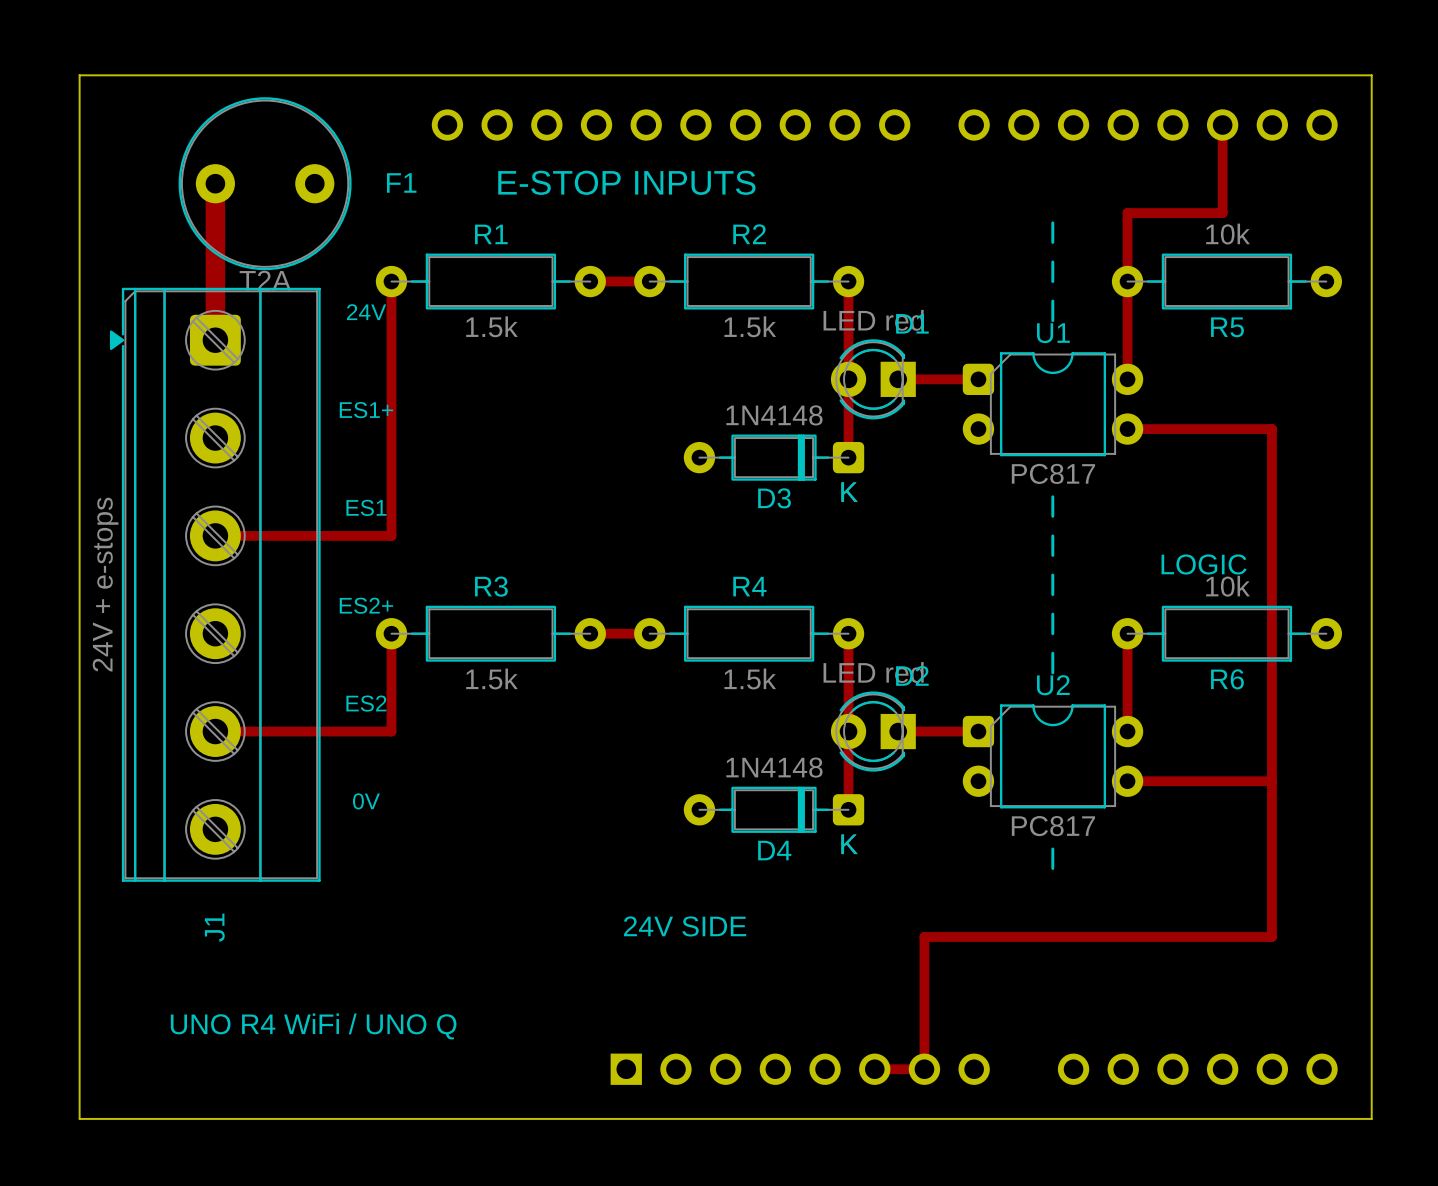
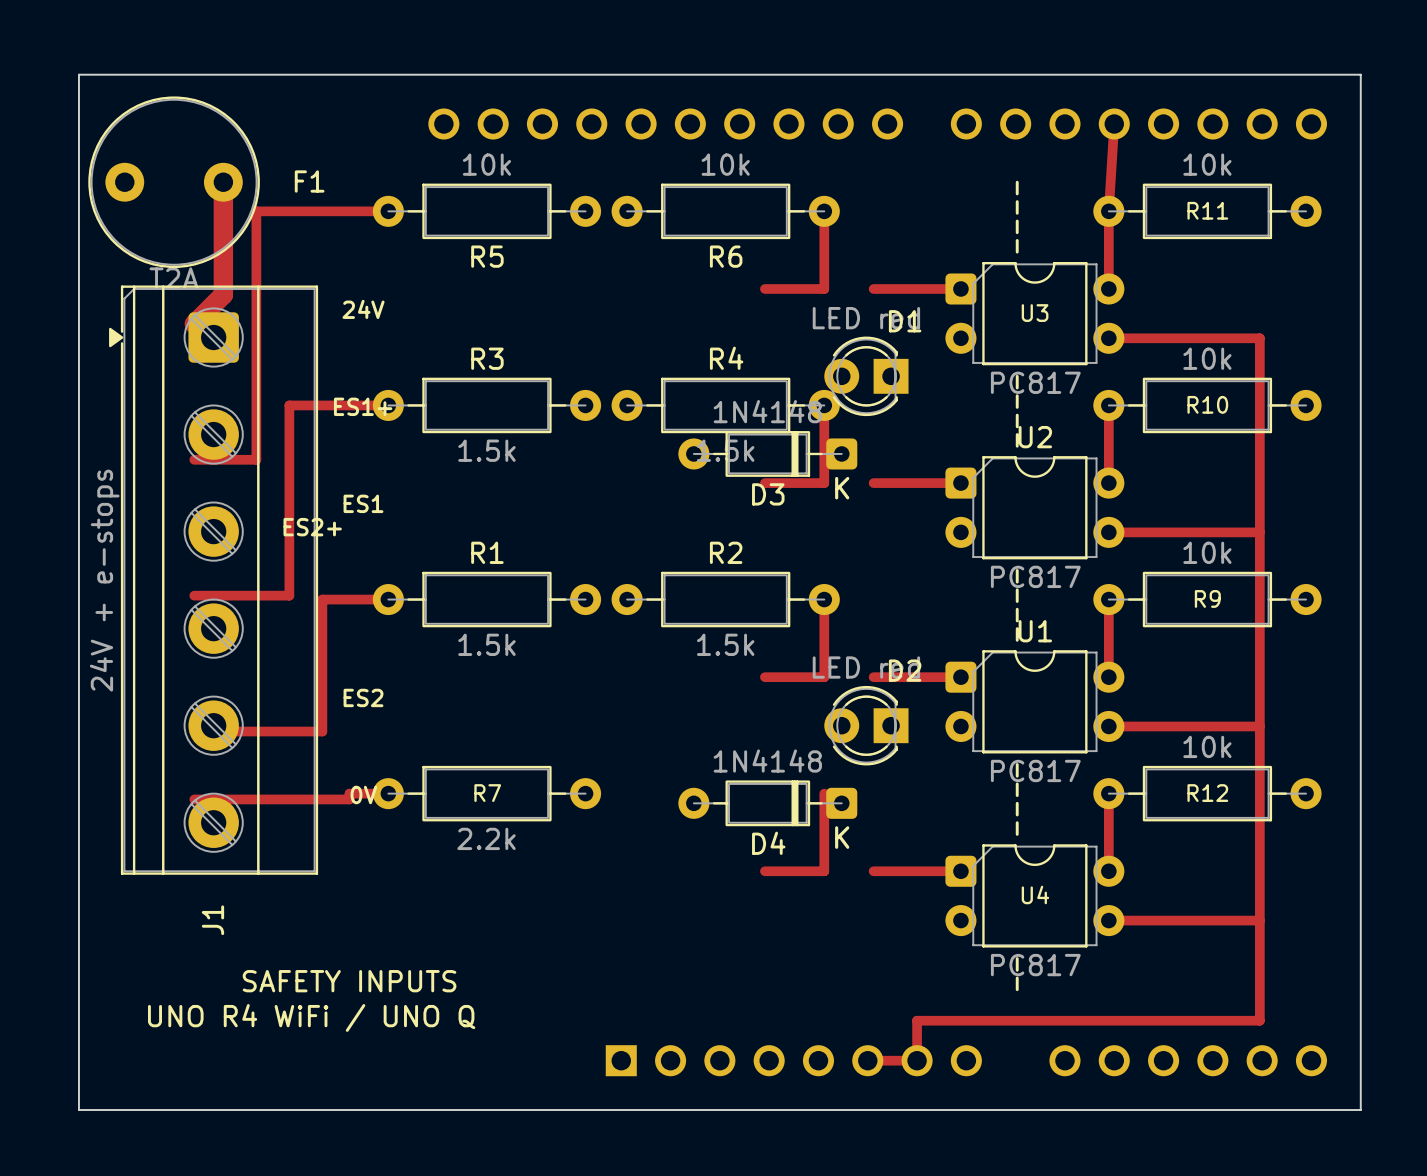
track: none -> (1114, 124) (1108, 211) (1108, 288)
track: (1222, 125) (1222, 213) (1127, 213) (1127, 379) -> none
text: E-STOP INPUTS (626, 182) -> none
track: (215, 183) (215, 340) -> none
track: none -> (223, 182) (223, 294) (194, 323)
F1 position: (265, 183) -> (174, 182)
line: none -> (1017, 182) (1017, 193)
line: none -> (1017, 201) (1017, 213)
track: none -> (388, 211) (256, 211) (256, 459) (194, 459)
track: none -> (824, 211) (824, 288) (764, 288)
R11: none -> 10k (1207, 211)
line: none -> (1017, 221) (1017, 232)
line: (1052, 222) (1052, 242) -> none
line: none -> (1017, 240) (1017, 252)
line: (1052, 261) (1052, 281) -> none
track: (391, 281) (391, 535) (215, 535) -> none
R1 position: (490, 281) -> (486, 599)
track: (590, 281) (649, 281) -> none
R2 position: (749, 281) -> (725, 599)
track: (848, 281) (848, 457) -> none
R5 position: (1226, 281) -> (486, 211)
track: none -> (873, 288) (960, 288)
line: (1052, 301) (1052, 320) -> none
U3: none -> PC817 (1034, 313)
track: (898, 379) (978, 379) -> none
line: none -> (1017, 376) (1017, 387)
line: none -> (1017, 395) (1017, 407)
U1 position: (1053, 404) -> (1034, 701)
track: none -> (388, 405) (289, 405) (289, 595) (194, 595)
track: none -> (824, 405) (824, 483) (764, 483)
track: none -> (1108, 405) (1108, 483)
R10: none -> 10k (1207, 405)
line: none -> (1017, 415) (1017, 426)
track: (1127, 429) (1271, 429) (1271, 936) (924, 936) (924, 1028) -> (1108, 338) (1259, 338) (1259, 1020) (917, 1020)
line: none -> (1017, 434) (1017, 446)
track: none -> (873, 483) (960, 483)
line: (1052, 496) (1052, 516) -> none
line: (1052, 535) (1052, 555) -> none
track: none -> (1108, 532) (1259, 532)
text: LOGIC (1204, 564) -> none
line: none -> (1017, 570) (1017, 582)
line: (1052, 575) (1052, 594) -> none
line: none -> (1017, 589) (1017, 601)
track: none -> (388, 599) (322, 599) (322, 731) (194, 731)
track: none -> (824, 599) (824, 677) (764, 677)
track: none -> (1108, 599) (1108, 677)
R9: none -> 10k (1207, 599)
text position: ES2+ (366, 605) -> ES2+ (312, 527)
line: none -> (1017, 609) (1017, 620)
line: (1052, 614) (1052, 633) -> none
track: (391, 633) (391, 731) (215, 731) -> none
R3 position: (490, 633) -> (486, 405)
track: (590, 633) (649, 633) -> none
R4 position: (749, 633) -> (725, 405)
track: (848, 633) (848, 809) -> none
line: none -> (1017, 628) (1017, 640)
track: (1127, 633) (1127, 731) -> none
R6 position: (1226, 633) -> (725, 211)
line: (1052, 653) (1052, 672) -> none
track: none -> (873, 677) (960, 677)
track: (898, 731) (978, 731) -> none
track: none -> (1108, 726) (1259, 726)
U2 position: (1053, 756) -> (1034, 507)
line: none -> (1017, 764) (1017, 776)
track: (1127, 781) (1271, 781) -> none
line: none -> (1017, 783) (1017, 795)
track: none -> (388, 793) (349, 793) (349, 799) (194, 799)
R7: none -> 2.2k (486, 793)
track: none -> (824, 793) (824, 871) (764, 871)
track: none -> (1108, 793) (1108, 871)
R12: none -> 10k (1207, 793)
line: none -> (1017, 803) (1017, 814)
line: none -> (1017, 822) (1017, 834)
line: (1052, 848) (1052, 868) -> none
track: none -> (873, 871) (960, 871)
U4: none -> PC817 (1034, 895)
text: 24V SIDE (685, 926) -> none
track: none -> (1108, 920) (1259, 920)
line: none -> (1017, 958) (1017, 970)
line: none -> (1017, 978) (1017, 989)
text: none -> SAFETY INPUTS (349, 981)

